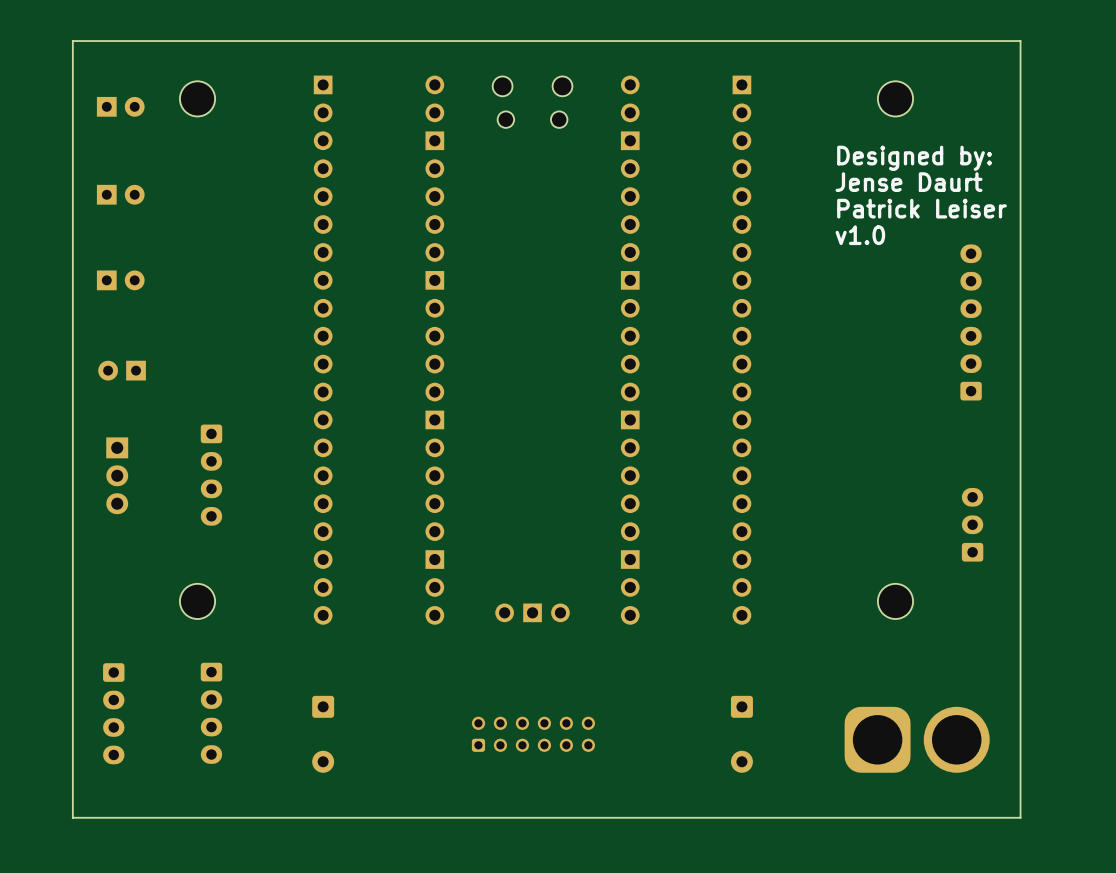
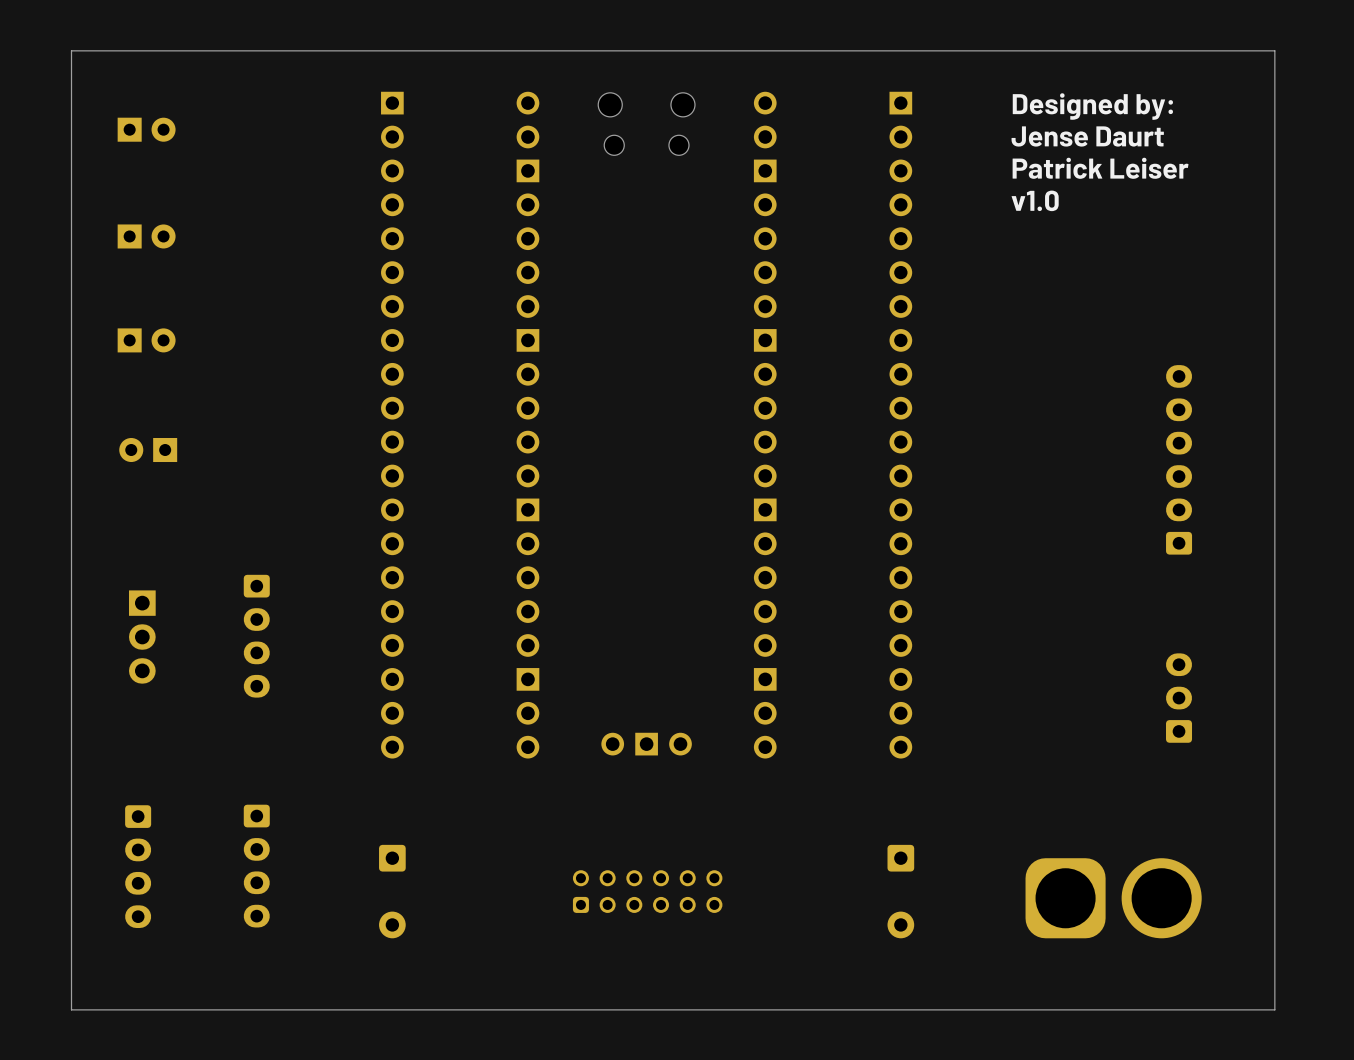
board edge: (1020, 41) (72, 41) (72, 817) (1020, 817) (1020, 41) -> (1274, 50) (1274, 1009) (71, 1009) (71, 50) (1274, 50)
part: (197, 98) -> none
part: (895, 98) -> none
text position: Designed by: (914, 158) -> Designed by: (1092, 106)
text position: Jense Daurt (909, 182) -> Jense Daurt (1087, 136)
text position: Patrick Leiser (921, 208) -> Patrick Leiser (1100, 168)
text position: v1.0 (860, 235) -> v1.0 (1035, 200)
part position: (971, 322) -> (1179, 459)
part position: (117, 475) -> (142, 637)
part position: (211, 475) -> (256, 636)
part position: (972, 524) -> (1179, 698)
part: (197, 601) -> none
part: (895, 601) -> none

